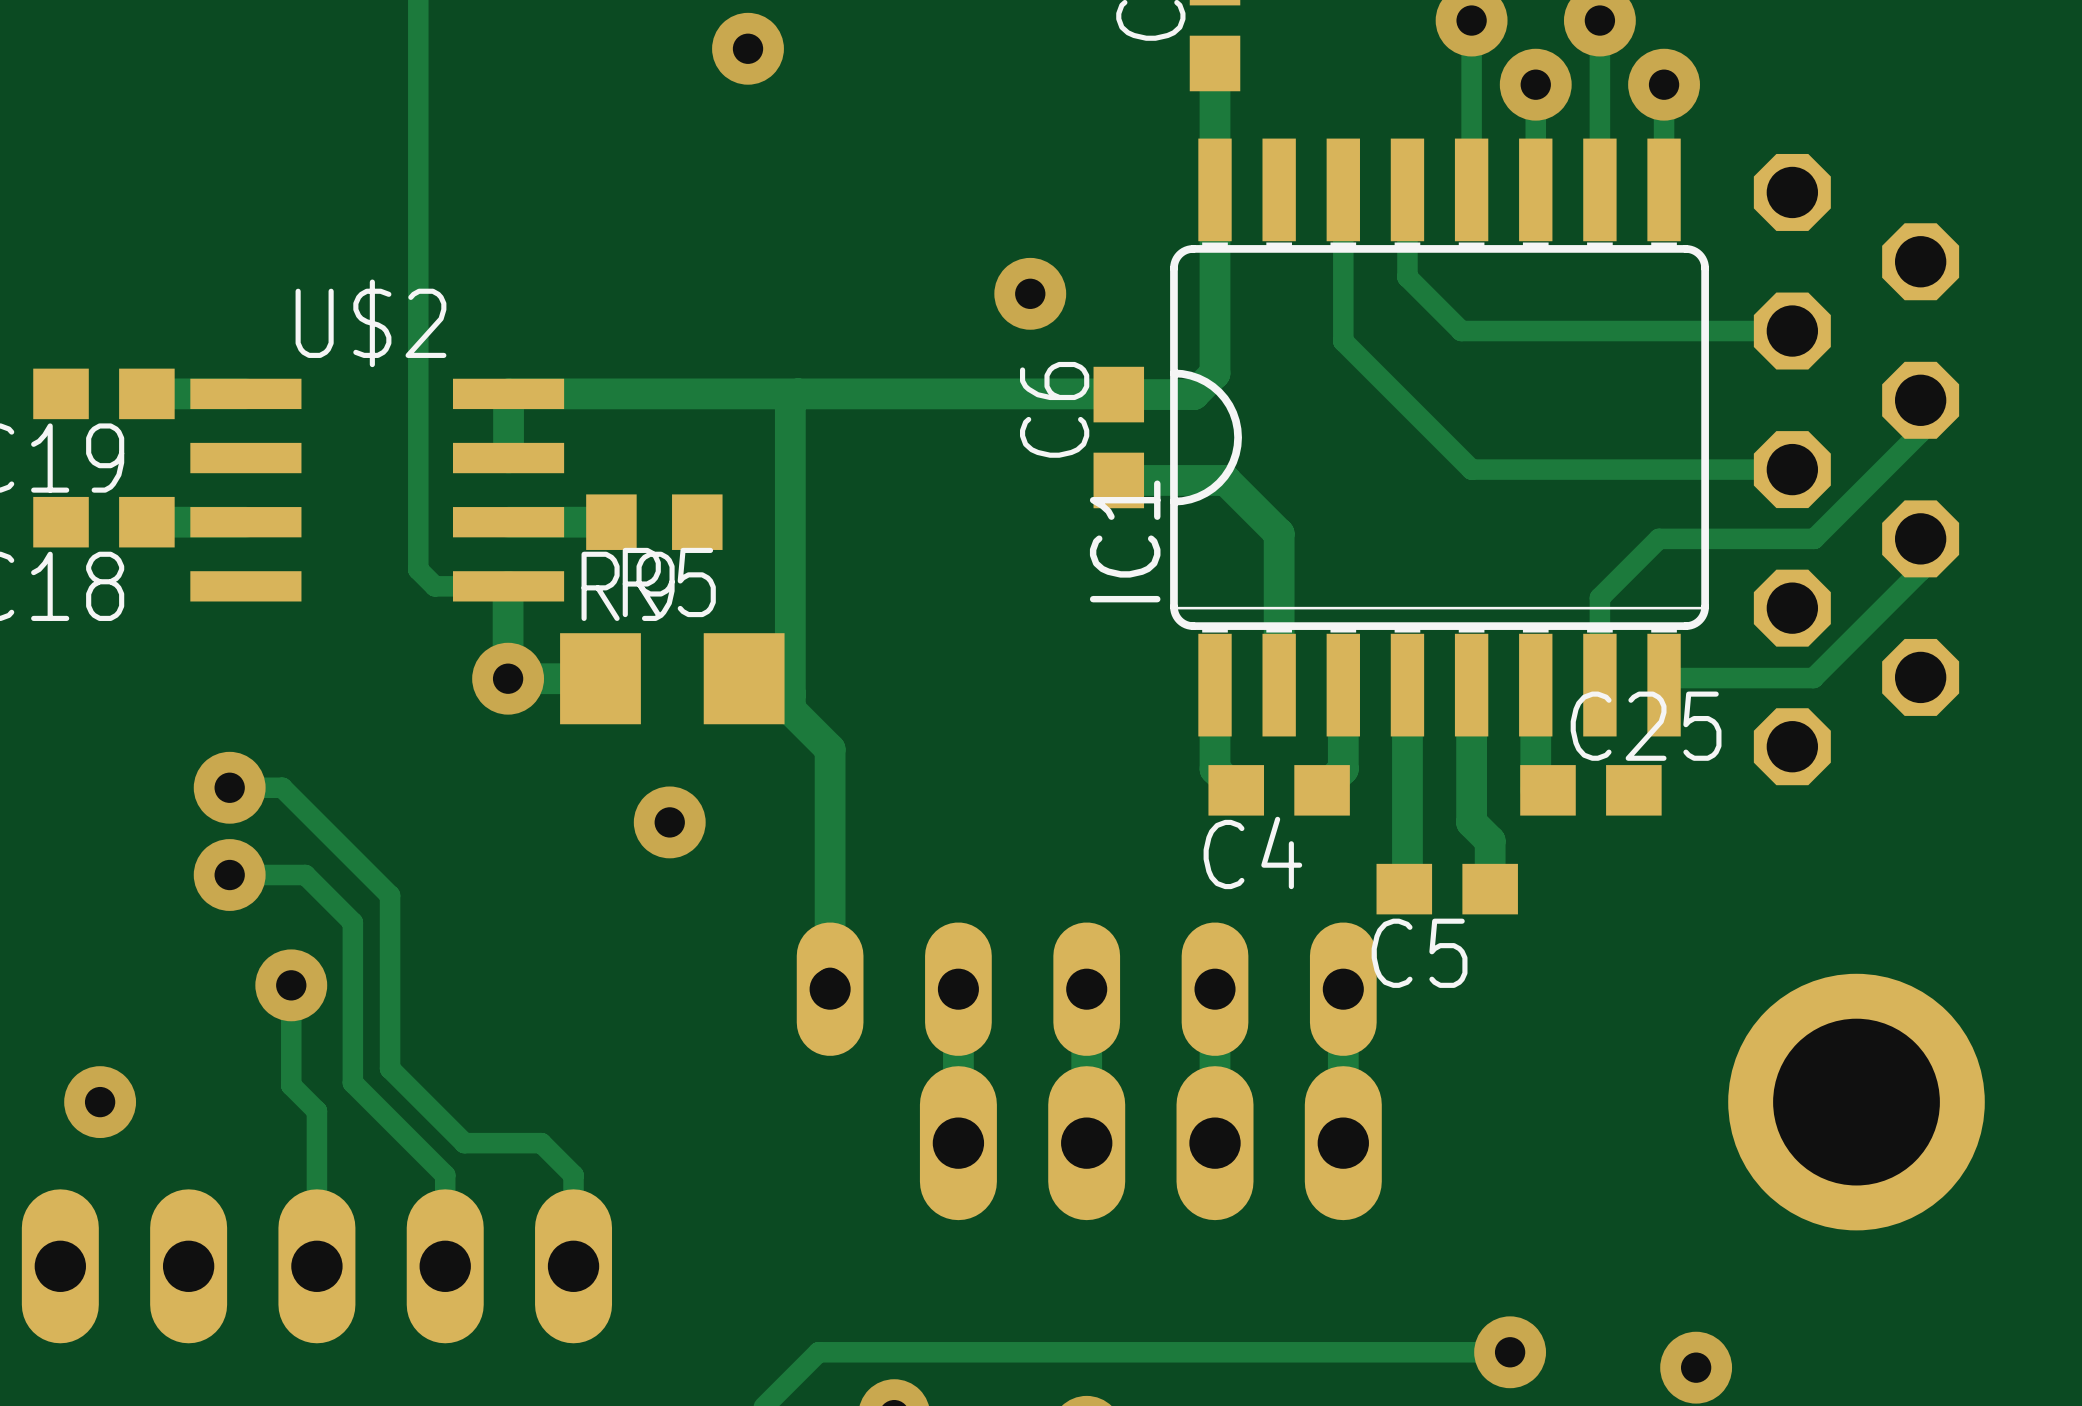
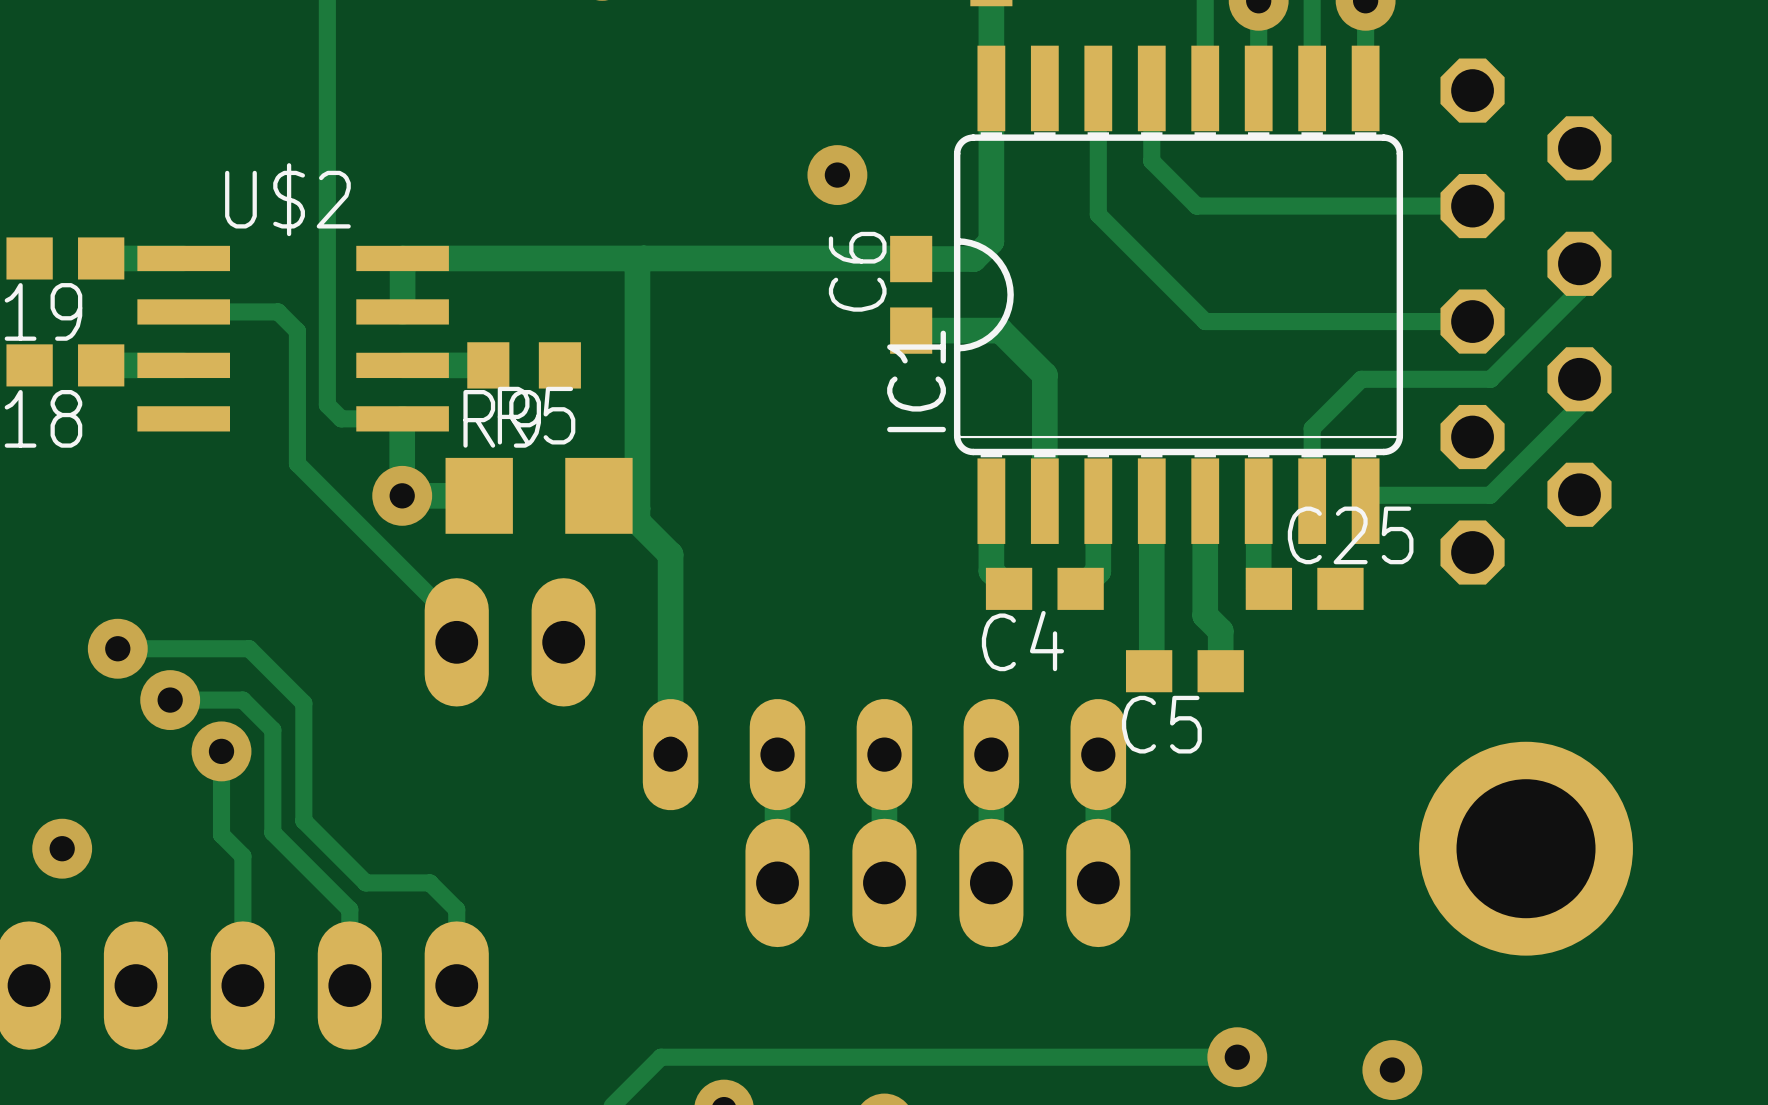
track: none -> (183, 311) (278, 311) (297, 331) (297, 463) (456, 623) (456, 642)
track: (229, 787) (282, 787) (390, 895) (390, 927) -> (117, 648) (249, 648) (303, 703)
via: (229, 787) -> none
via: (669, 822) -> none
part: none -> (510, 642)
via: none -> (117, 648)
track: (229, 875) (305, 875) (352, 922) (352, 959) -> (170, 700) (242, 700) (272, 730)
via: (229, 875) -> none
via: none -> (170, 700)

